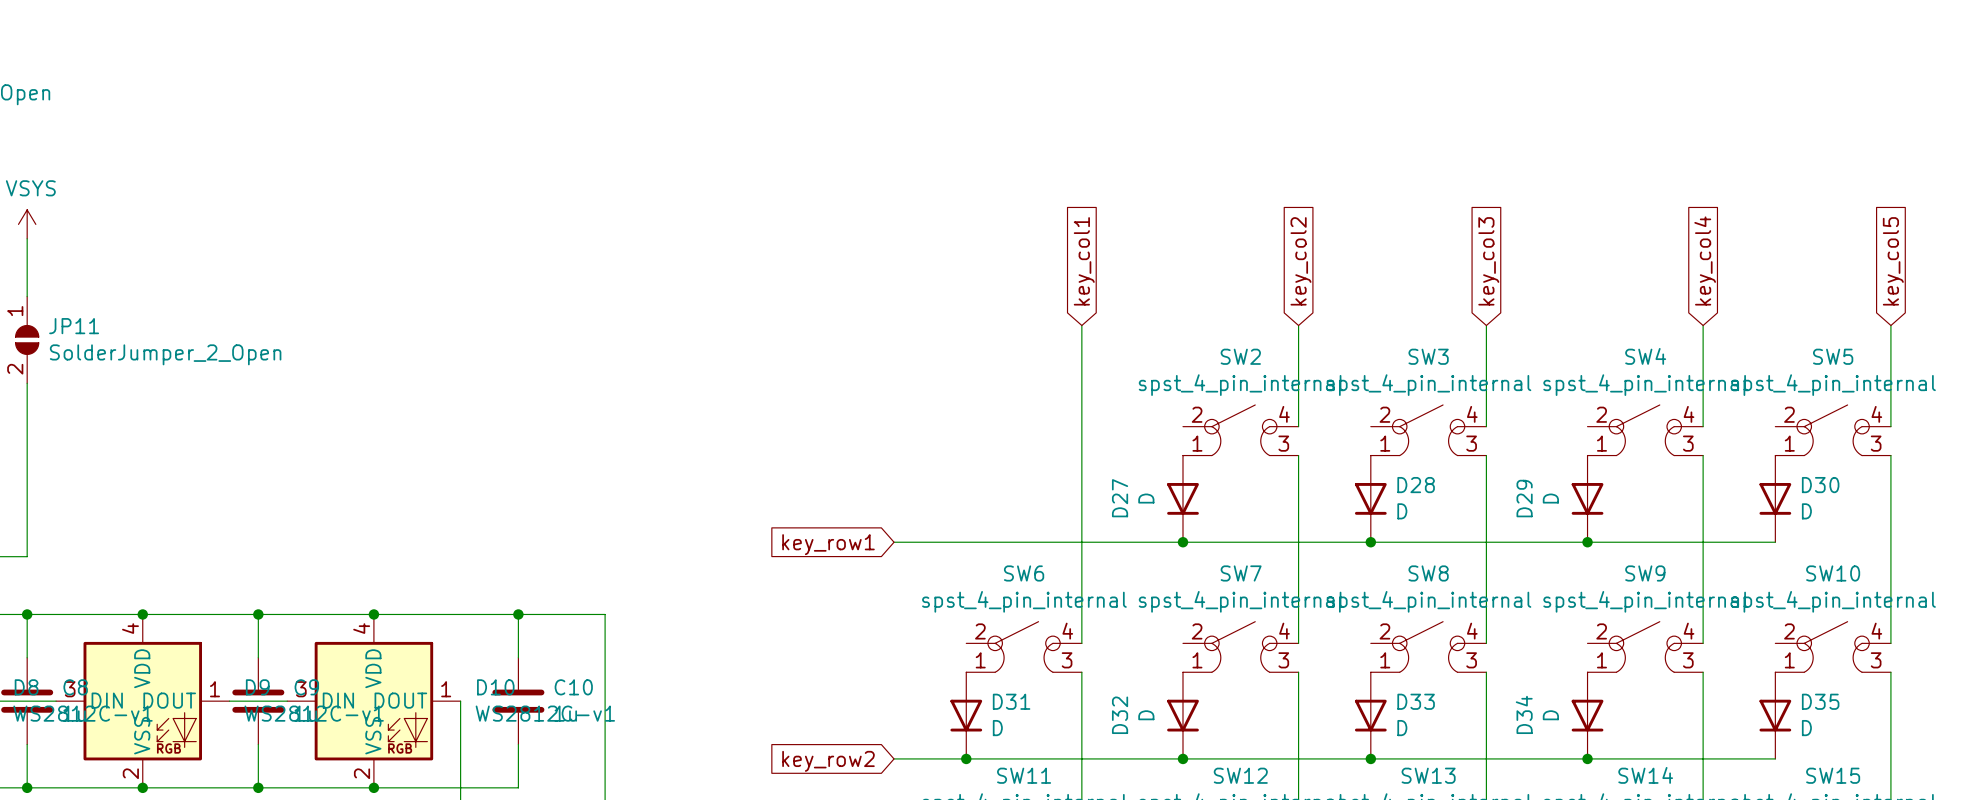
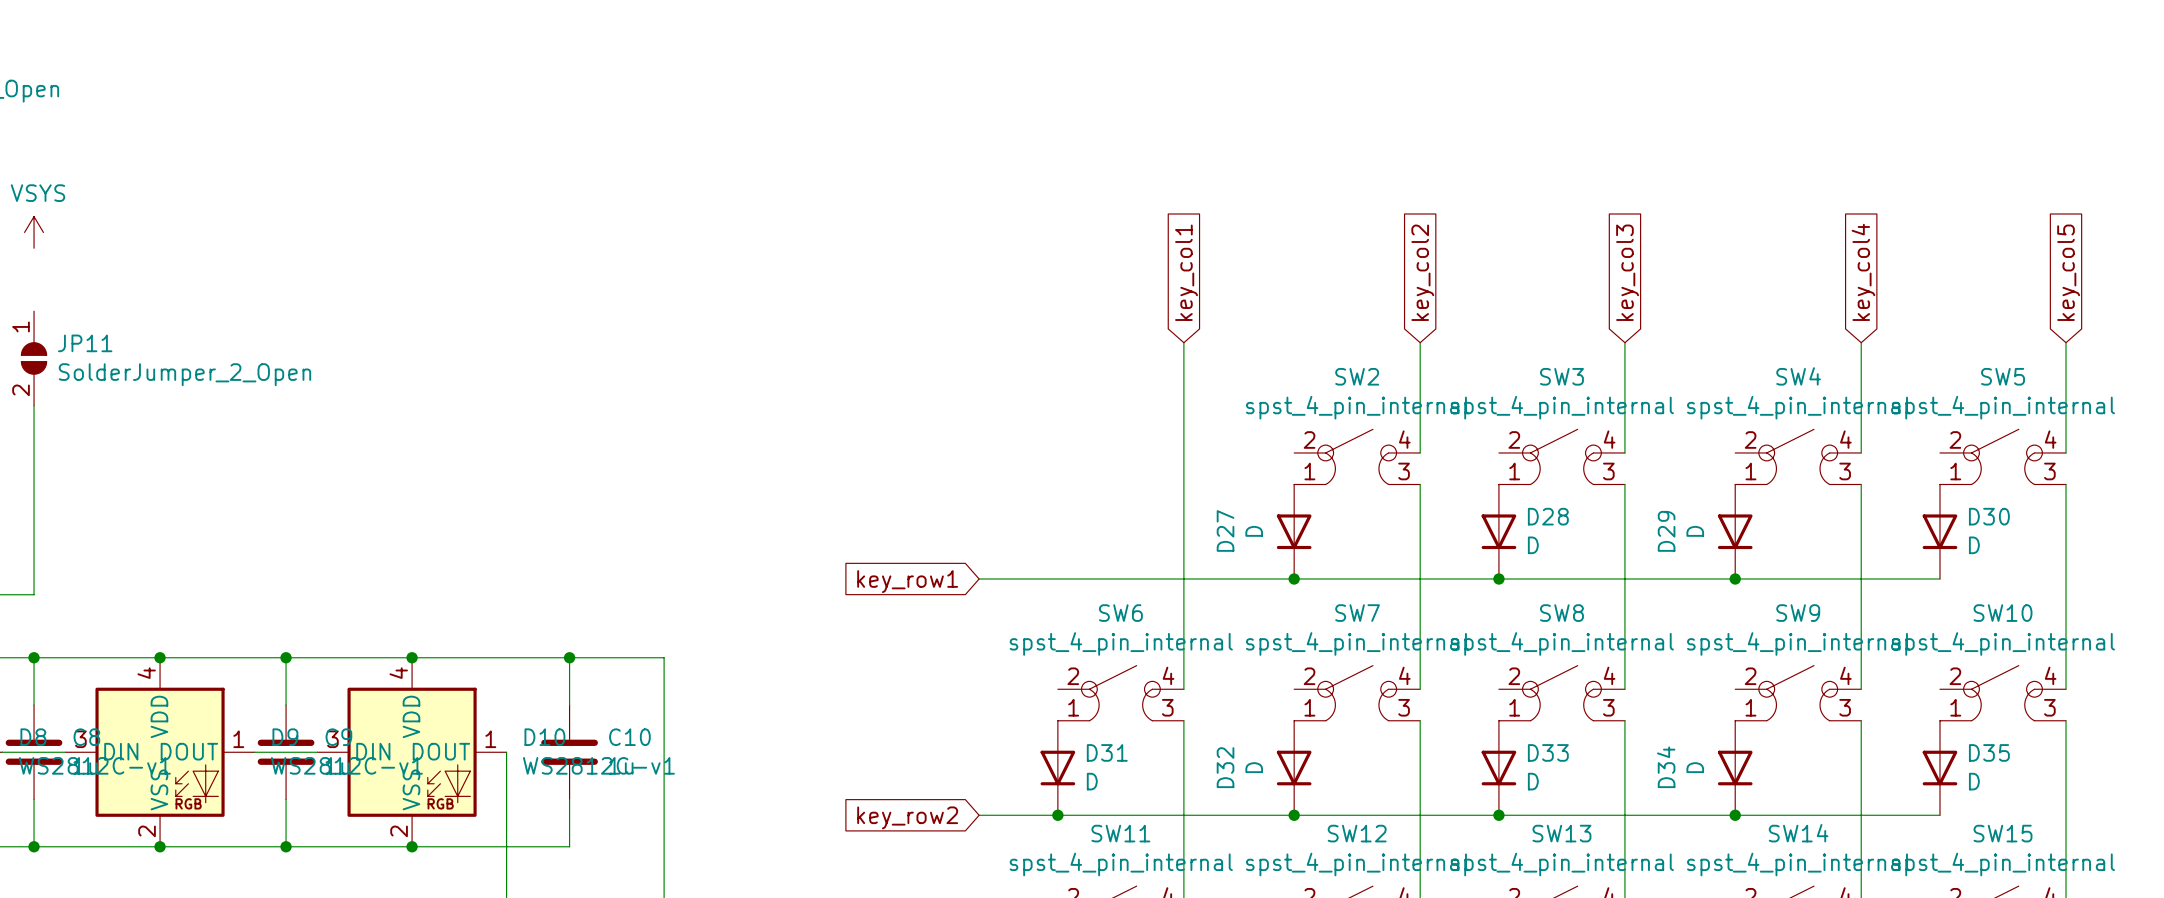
wire: (27, 238) (27, 296) -> none

